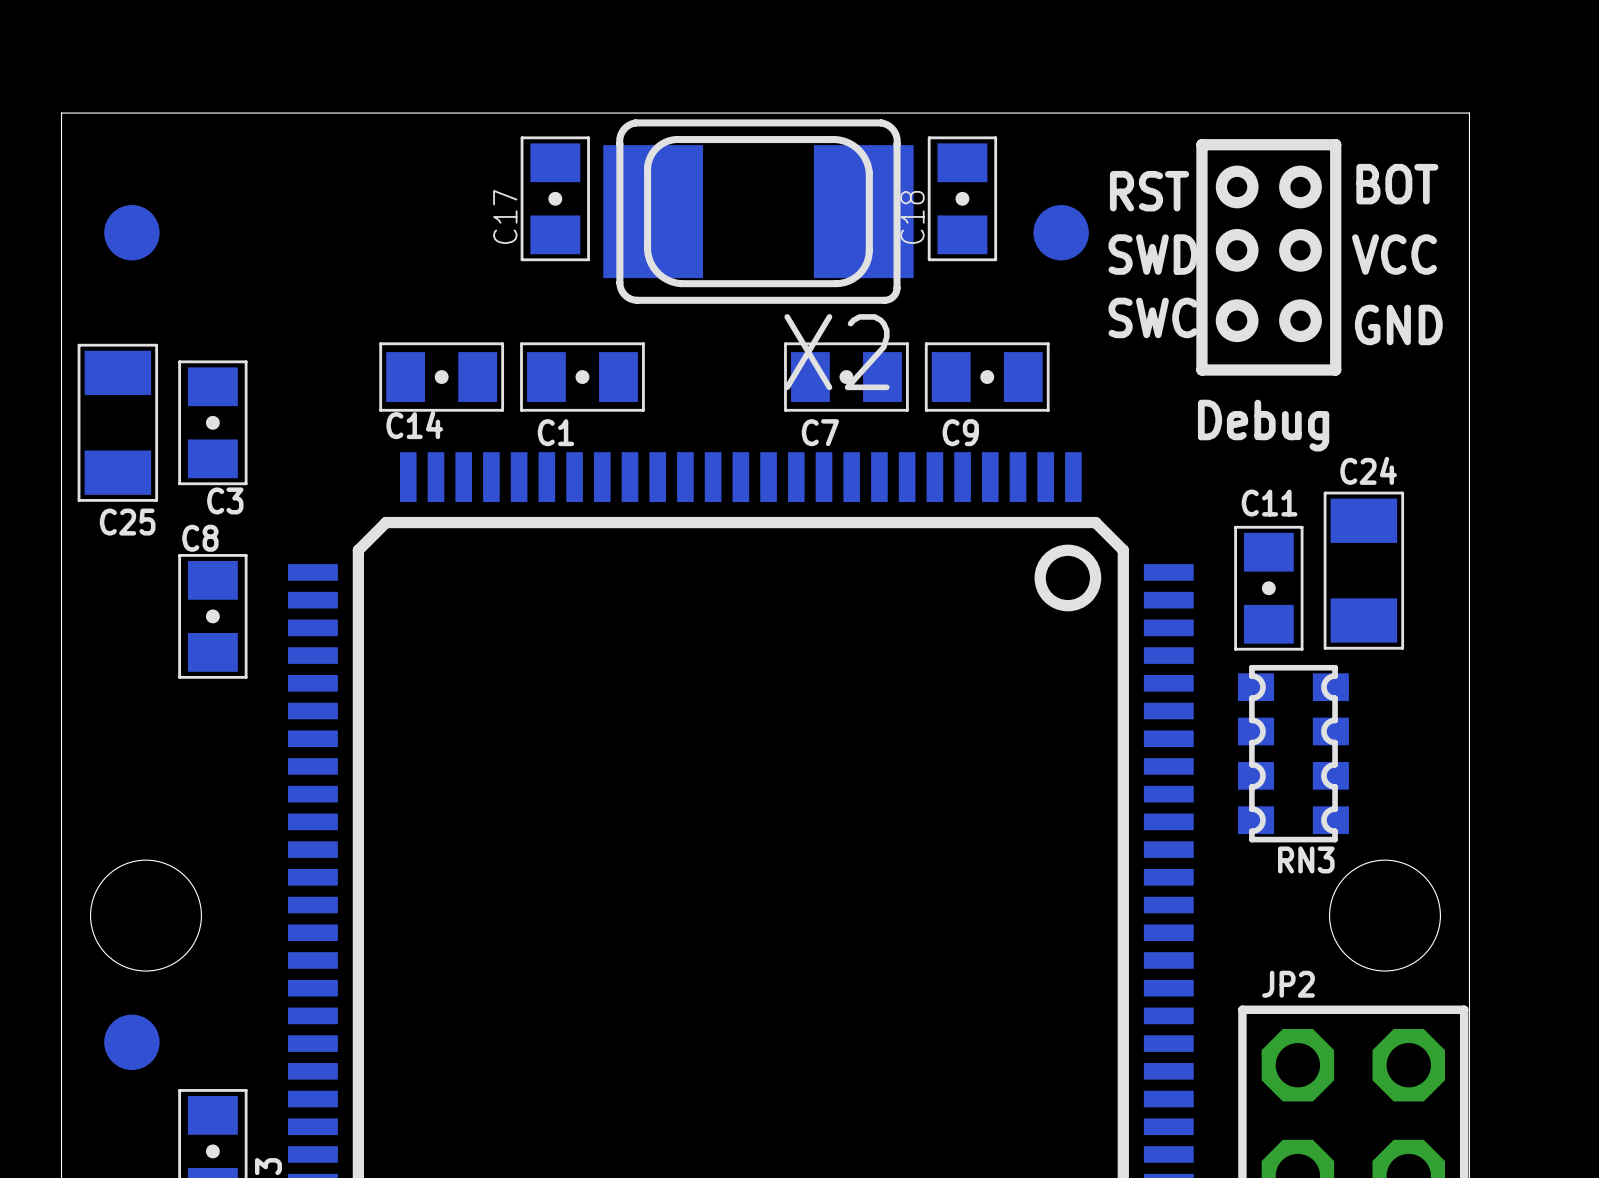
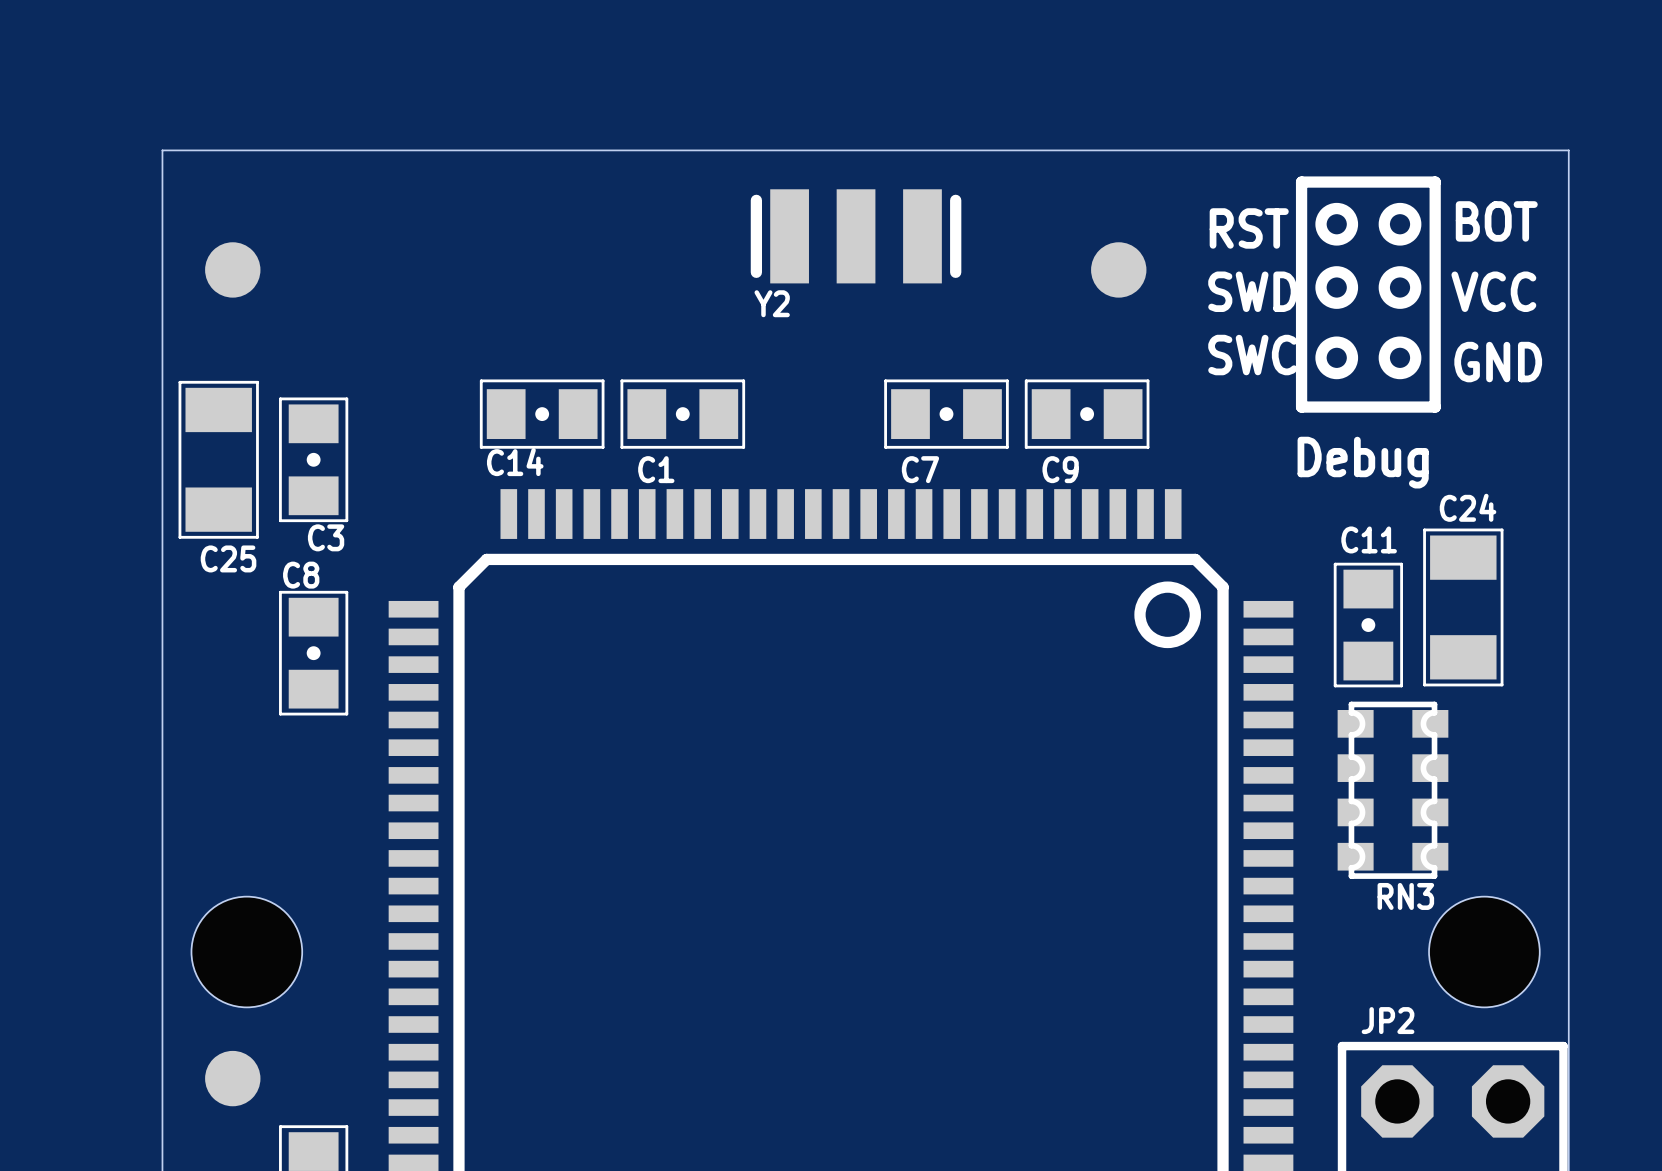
C17: (555, 198) -> none
C18: (962, 198) -> none
Y2: none -> (856, 236)
X2: (758, 211) -> none
part position: (1061, 232) -> (1118, 269)

